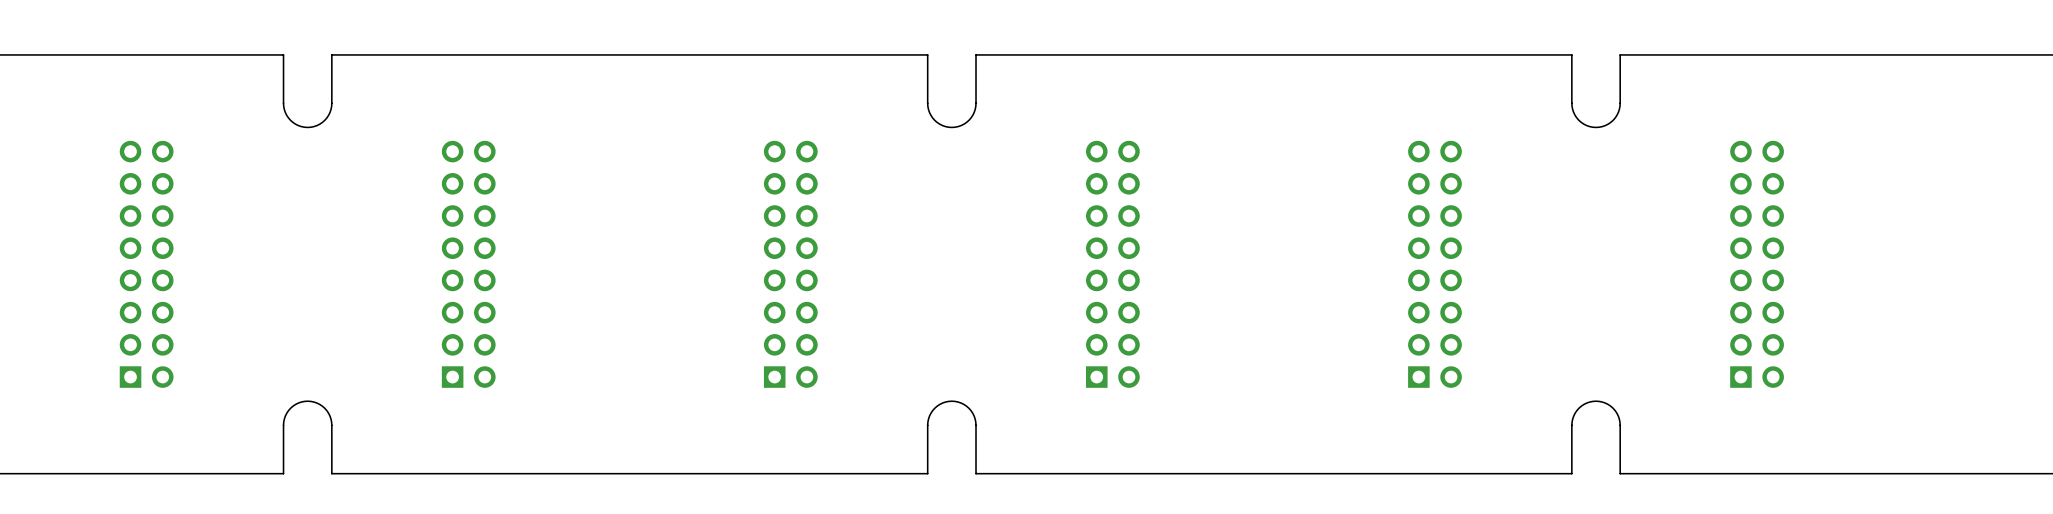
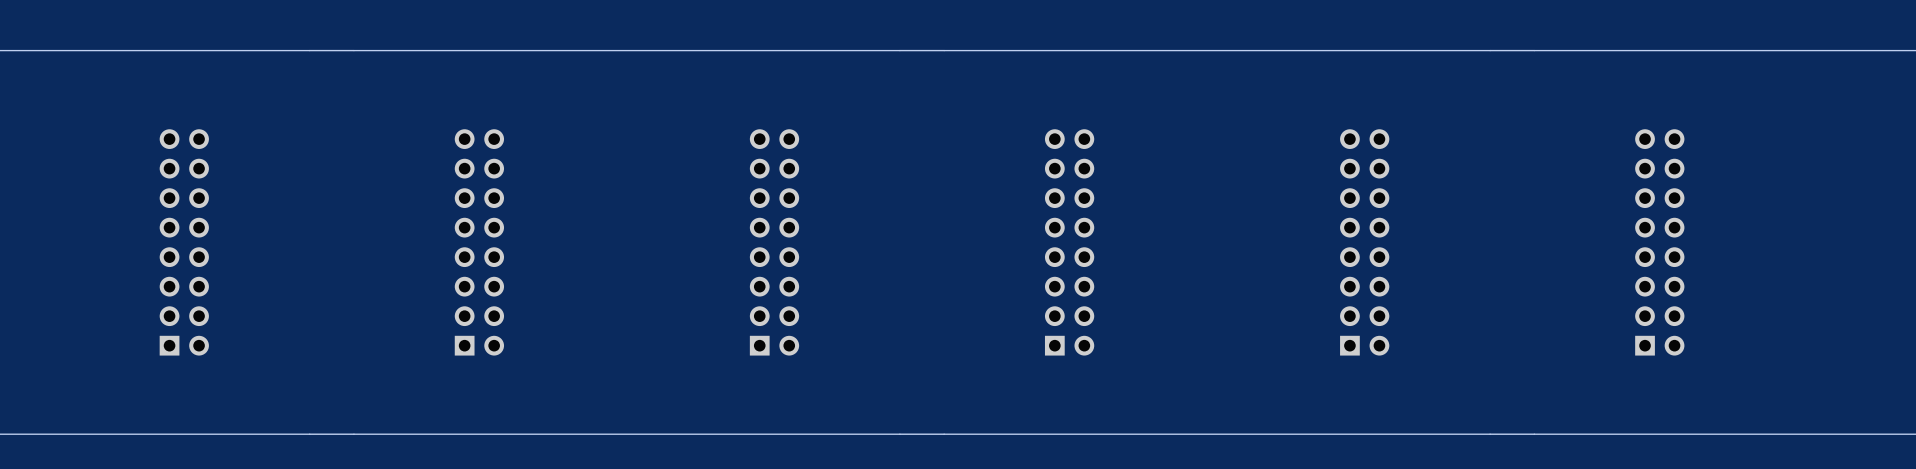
board edge: (331, 54) (331, 109) (322, 122) (307, 127) (292, 122) (284, 109) (283, 54) -> (353, 50) (309, 50)
board edge: (976, 54) (975, 109) (966, 122) (951, 127) (937, 122) (928, 109) (927, 54) -> (944, 50) (899, 50)
board edge: (1620, 54) (1619, 109) (1610, 122) (1596, 127) (1581, 122) (1572, 109) (1571, 54) -> (1534, 50) (1490, 50)
board edge: (331, 473) (331, 419) (322, 406) (307, 401) (292, 406) (284, 419) (283, 473) -> (353, 434) (309, 434)
board edge: (976, 473) (975, 419) (966, 406) (951, 401) (937, 406) (928, 419) (927, 473) -> (944, 434) (899, 434)
board edge: (1620, 473) (1619, 419) (1610, 406) (1596, 401) (1581, 406) (1572, 419) (1571, 473) -> (1534, 434) (1490, 434)

